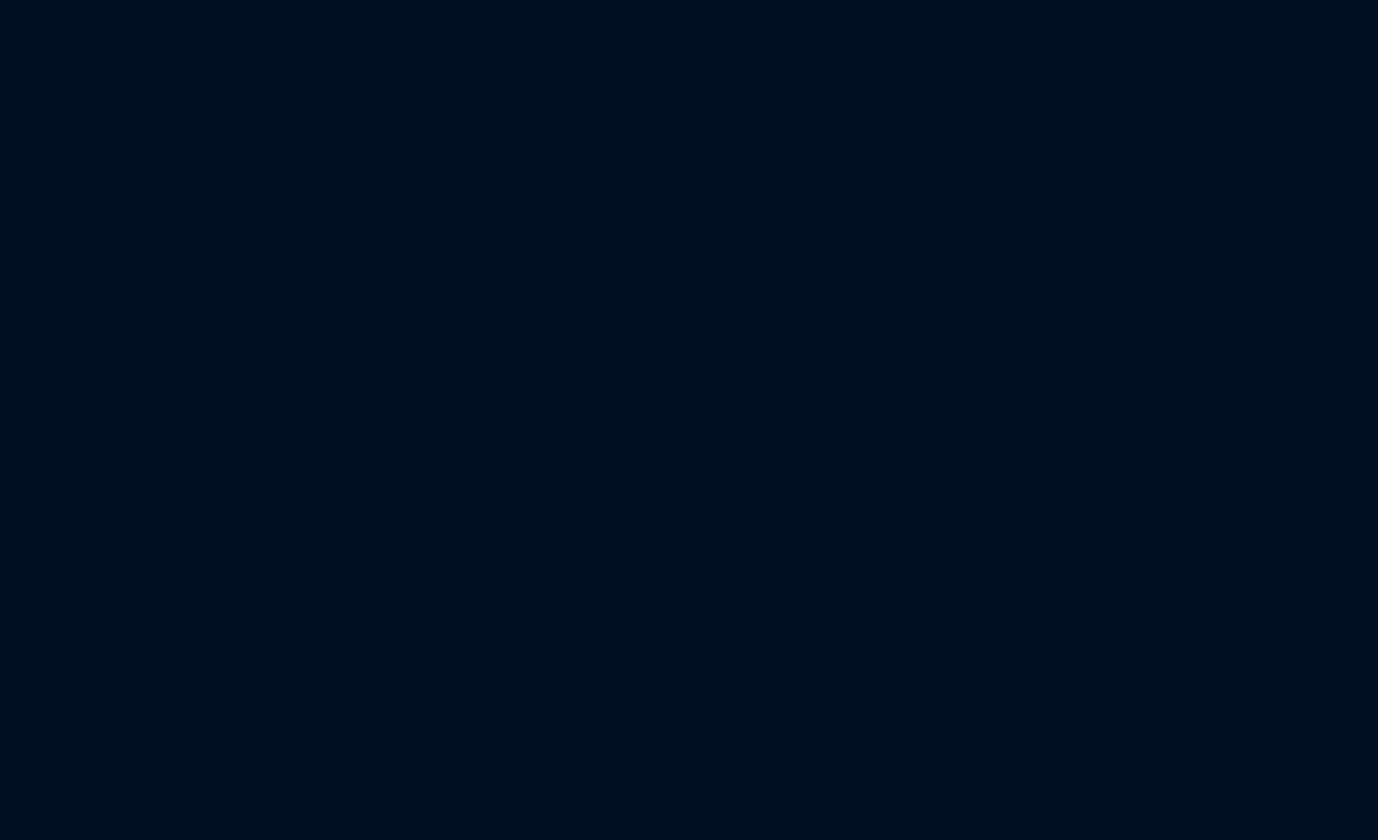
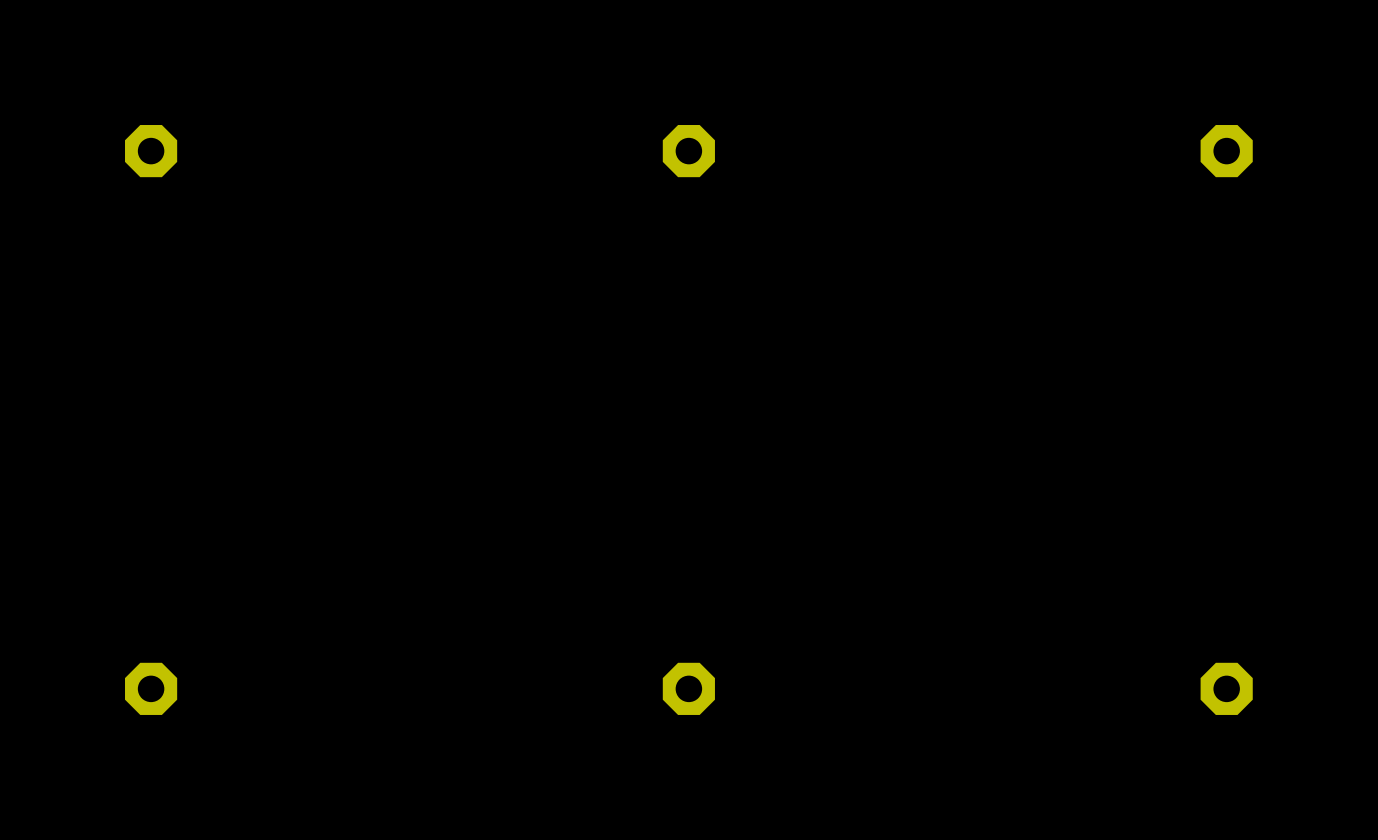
part: none -> (151, 151)
part: none -> (688, 151)
part: none -> (1226, 151)
part: none -> (151, 688)
part: none -> (688, 688)
part: none -> (1226, 688)

